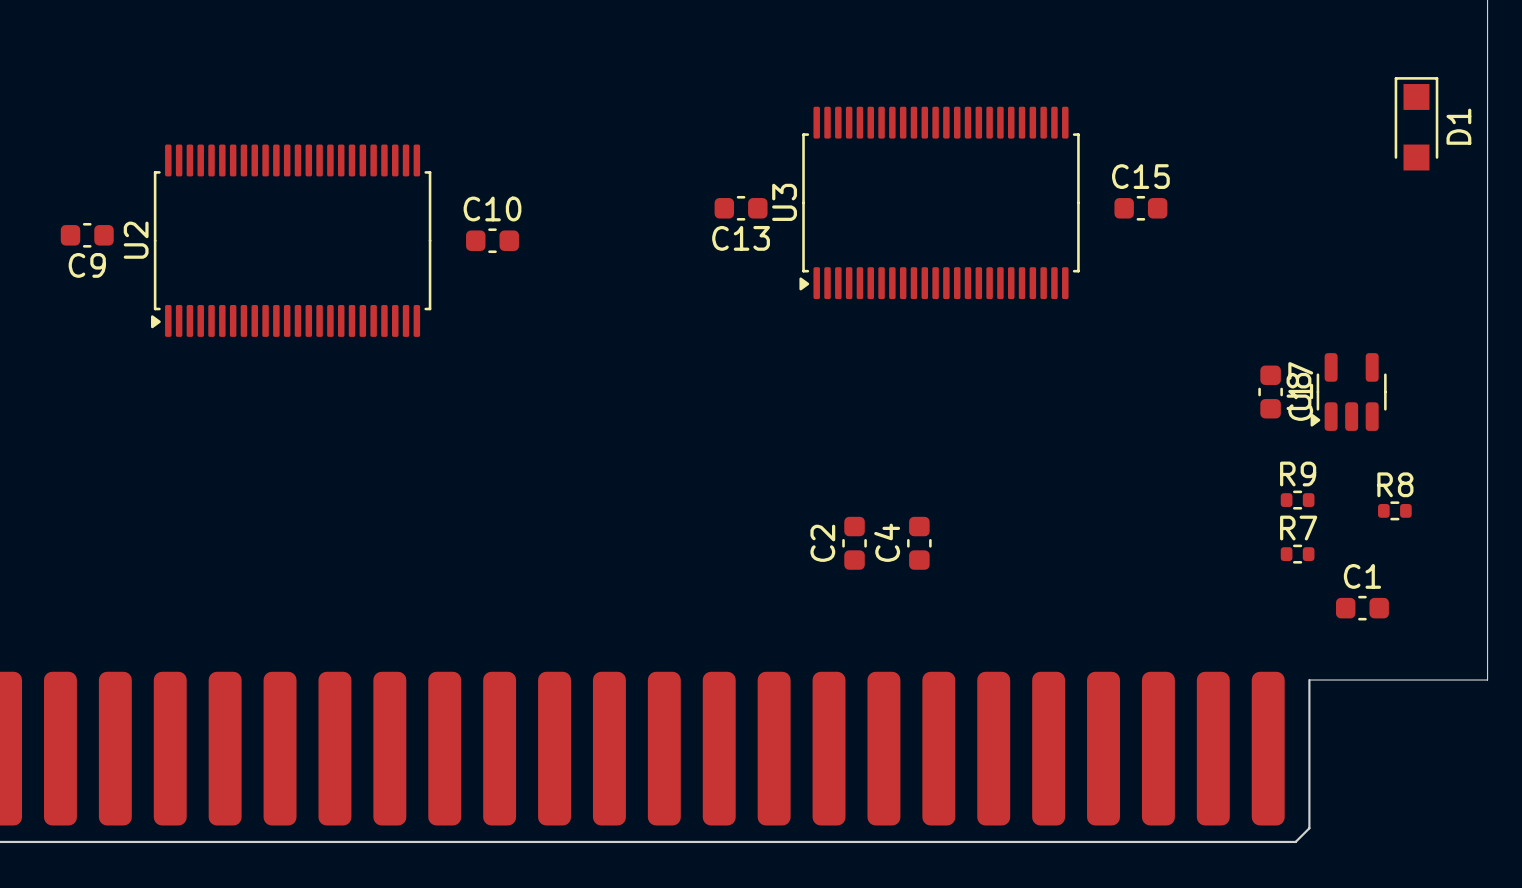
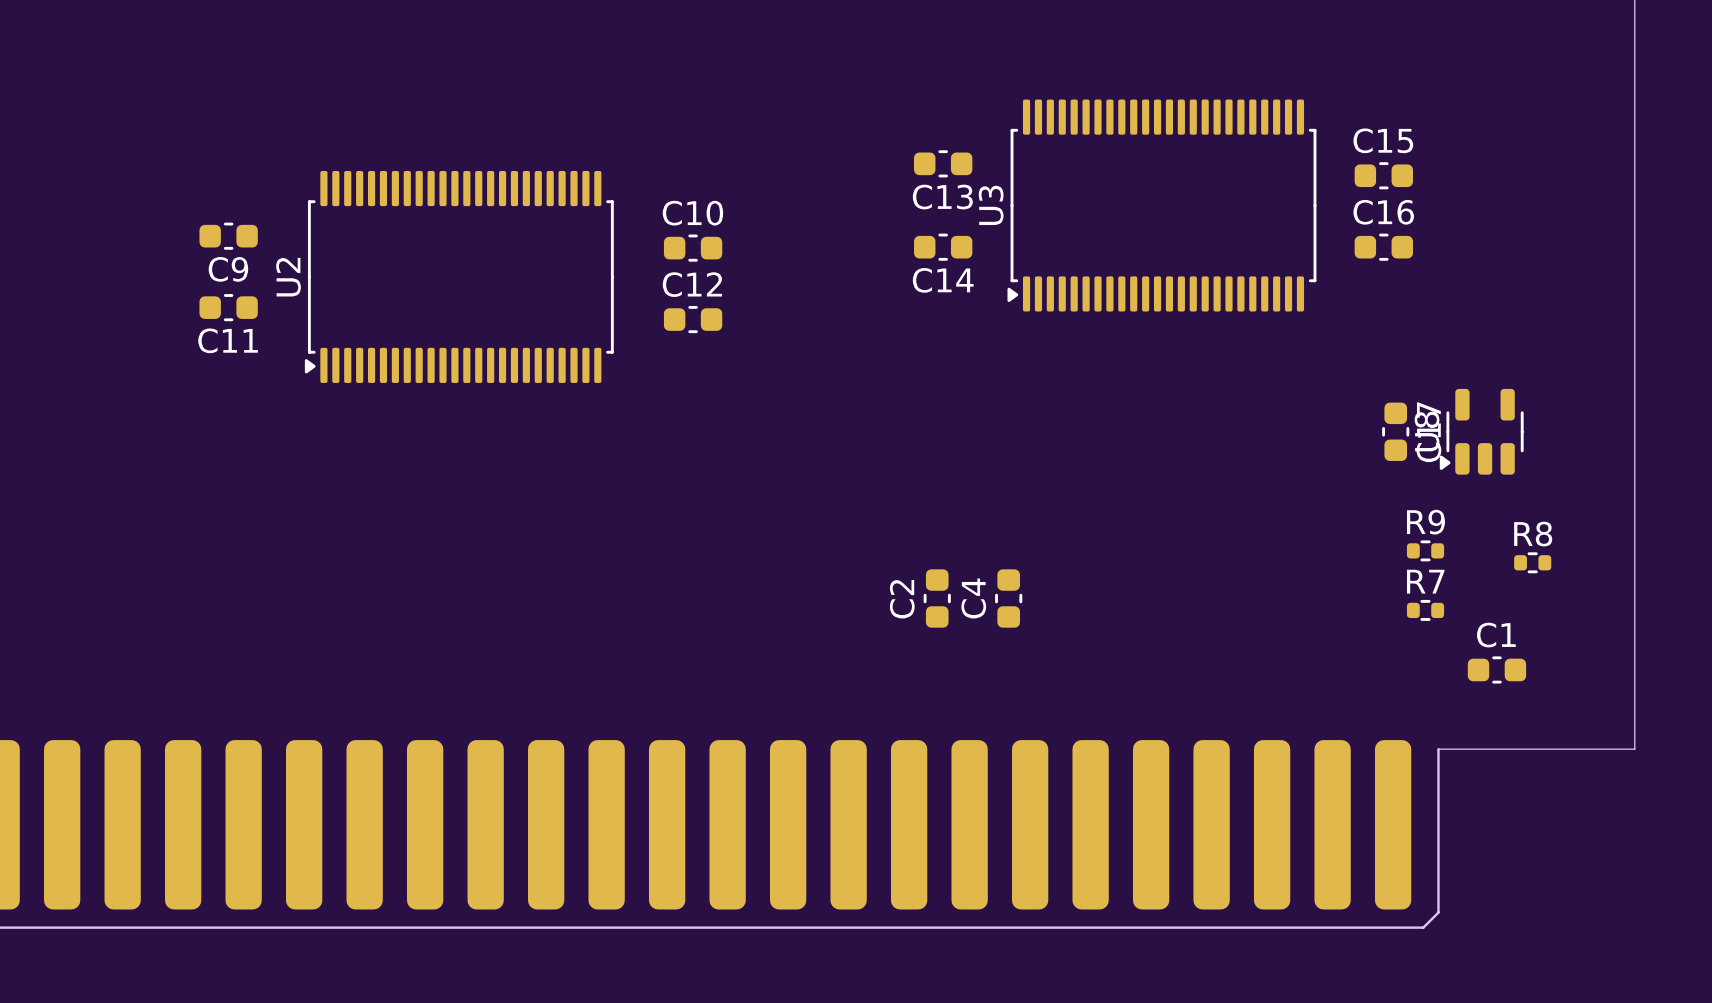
D1: (1416, 123) -> none
U3 position: (939, 202) -> (1161, 205)
C13 position: (741, 208) -> (943, 163)
C15 position: (1140, 208) -> (1383, 175)
C14: none -> (943, 247)
C16: none -> (1383, 247)
C9 position: (87, 235) -> (228, 236)
U2 position: (291, 240) -> (459, 276)
C10 position: (492, 240) -> (693, 248)
C11: none -> (228, 307)
C12: none -> (693, 319)

